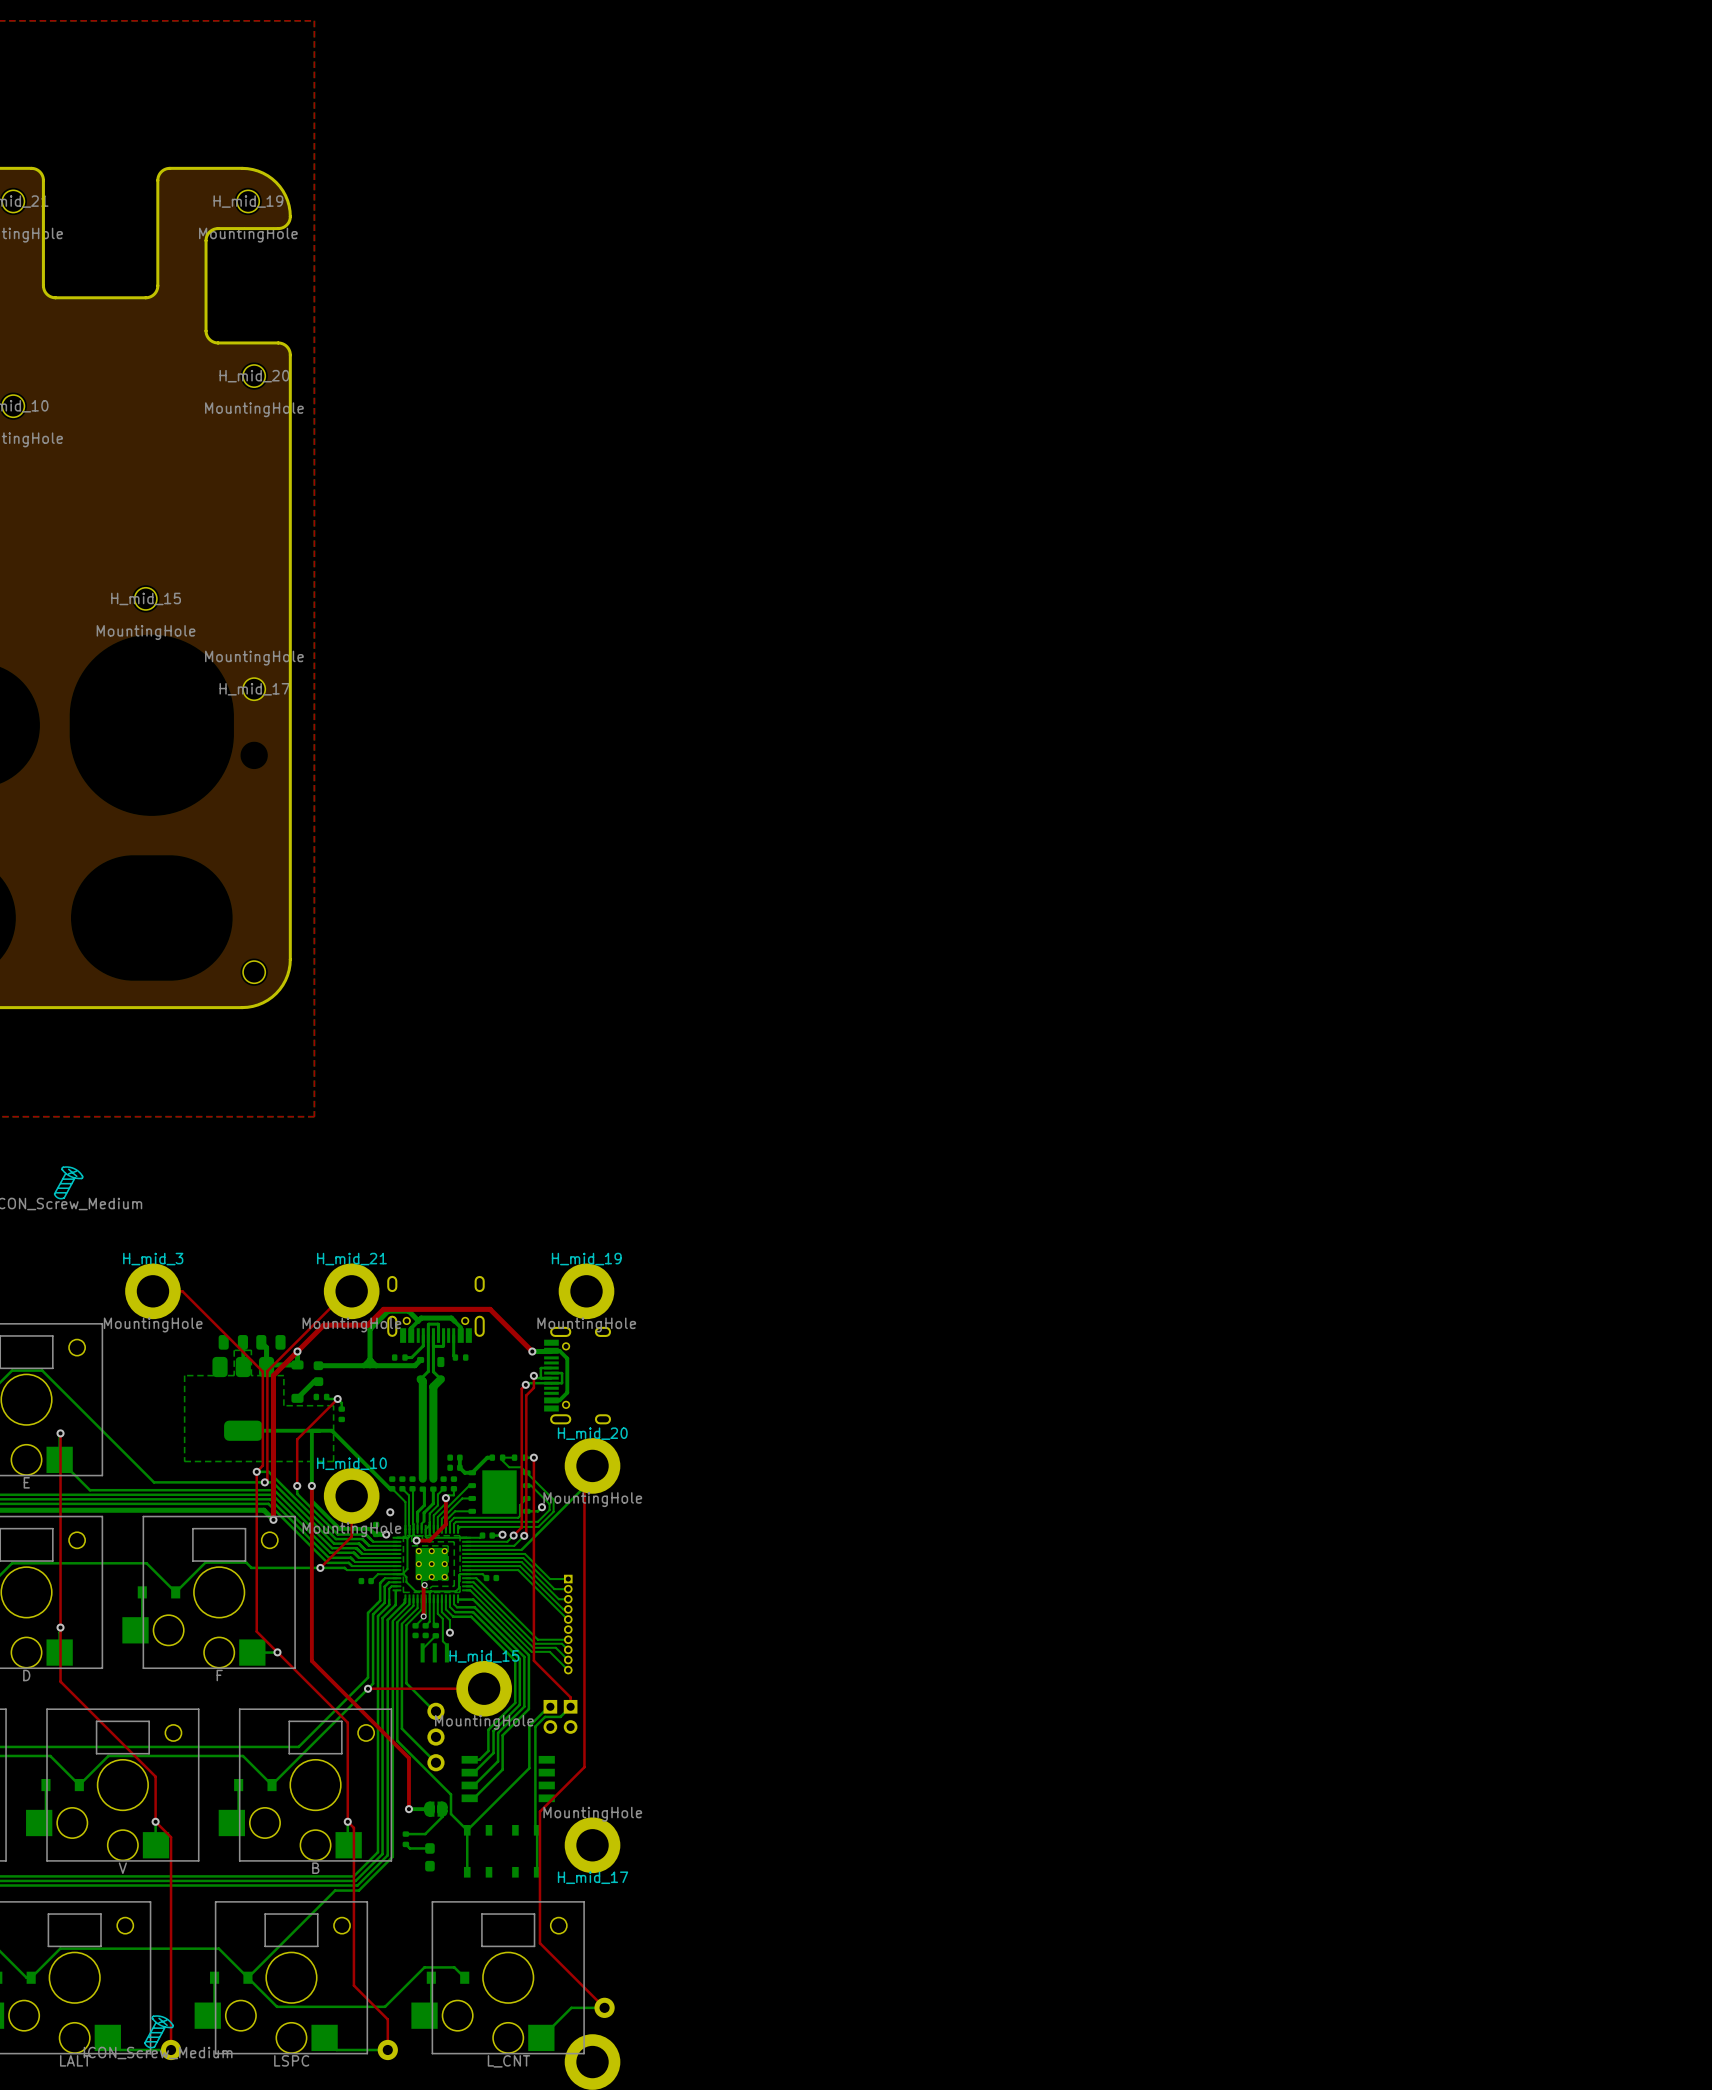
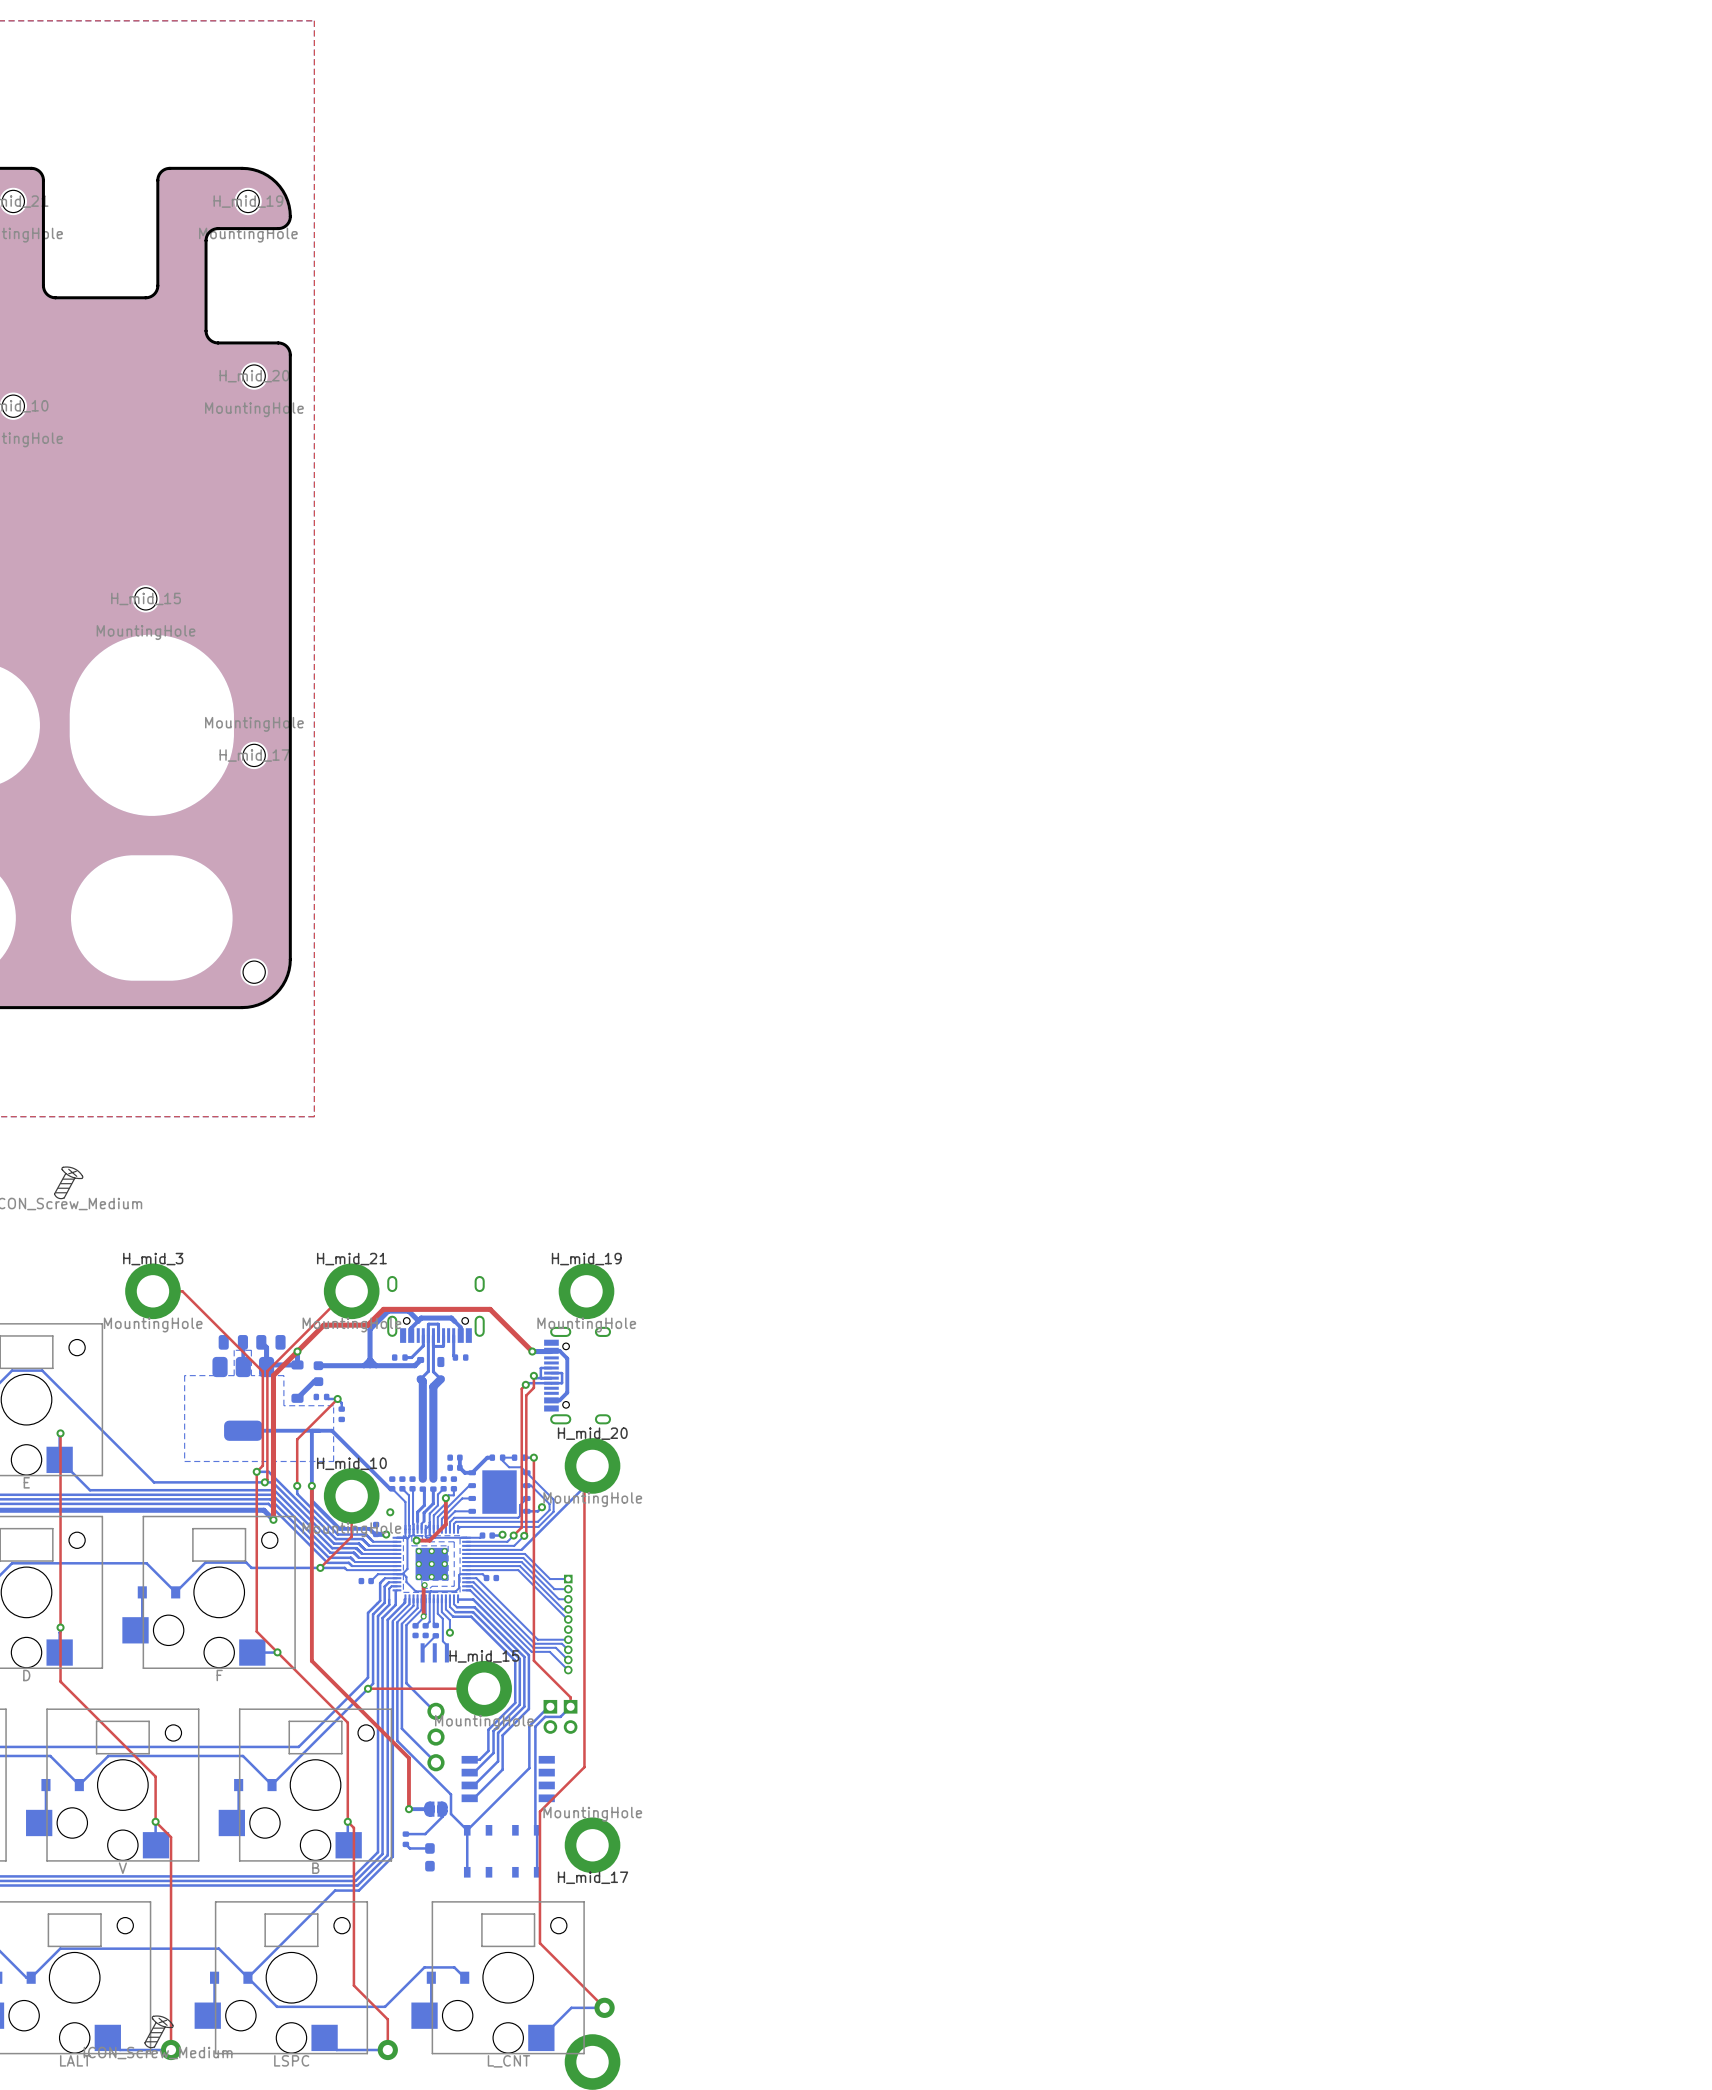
H_mid_17 position: (254, 689) -> (254, 755)

